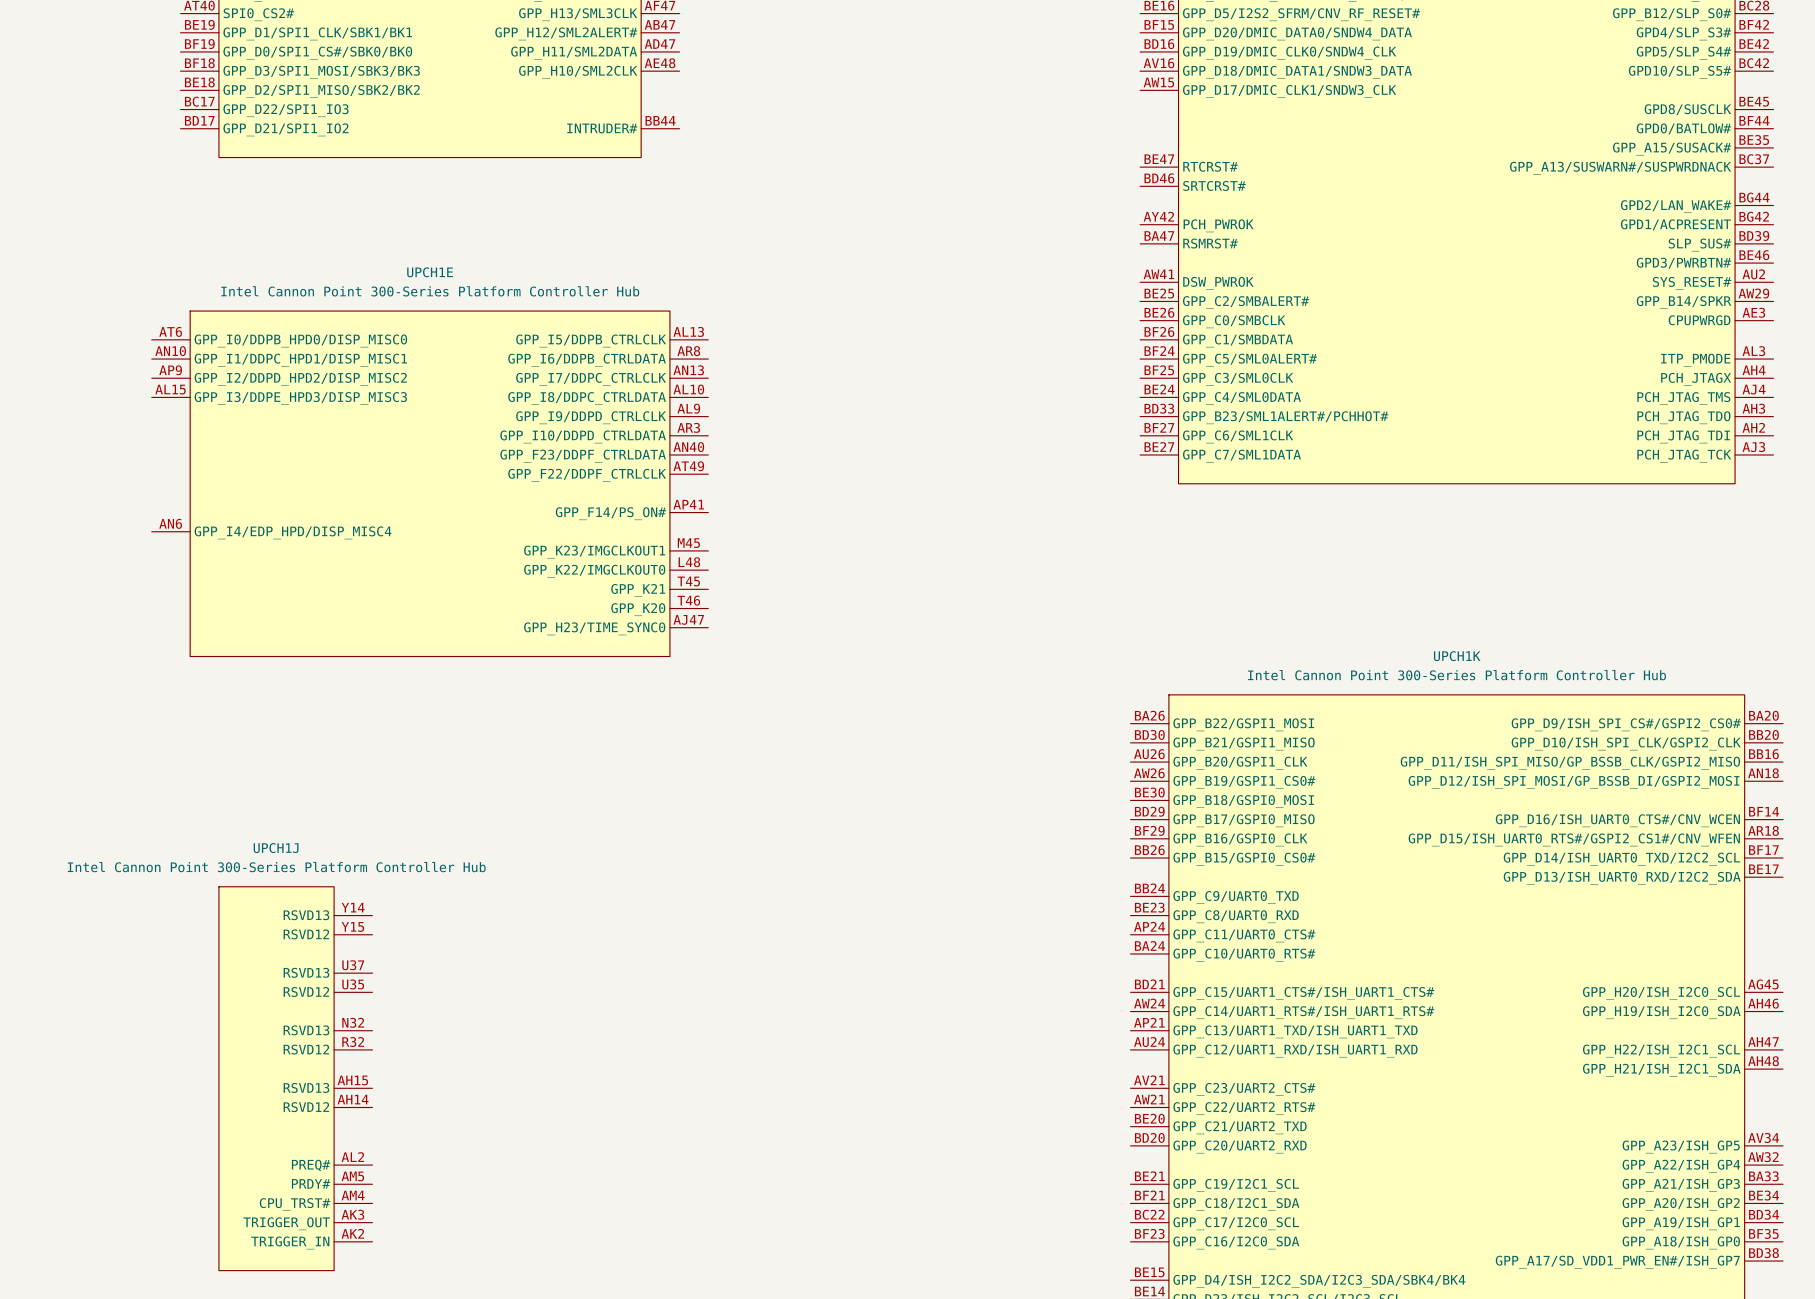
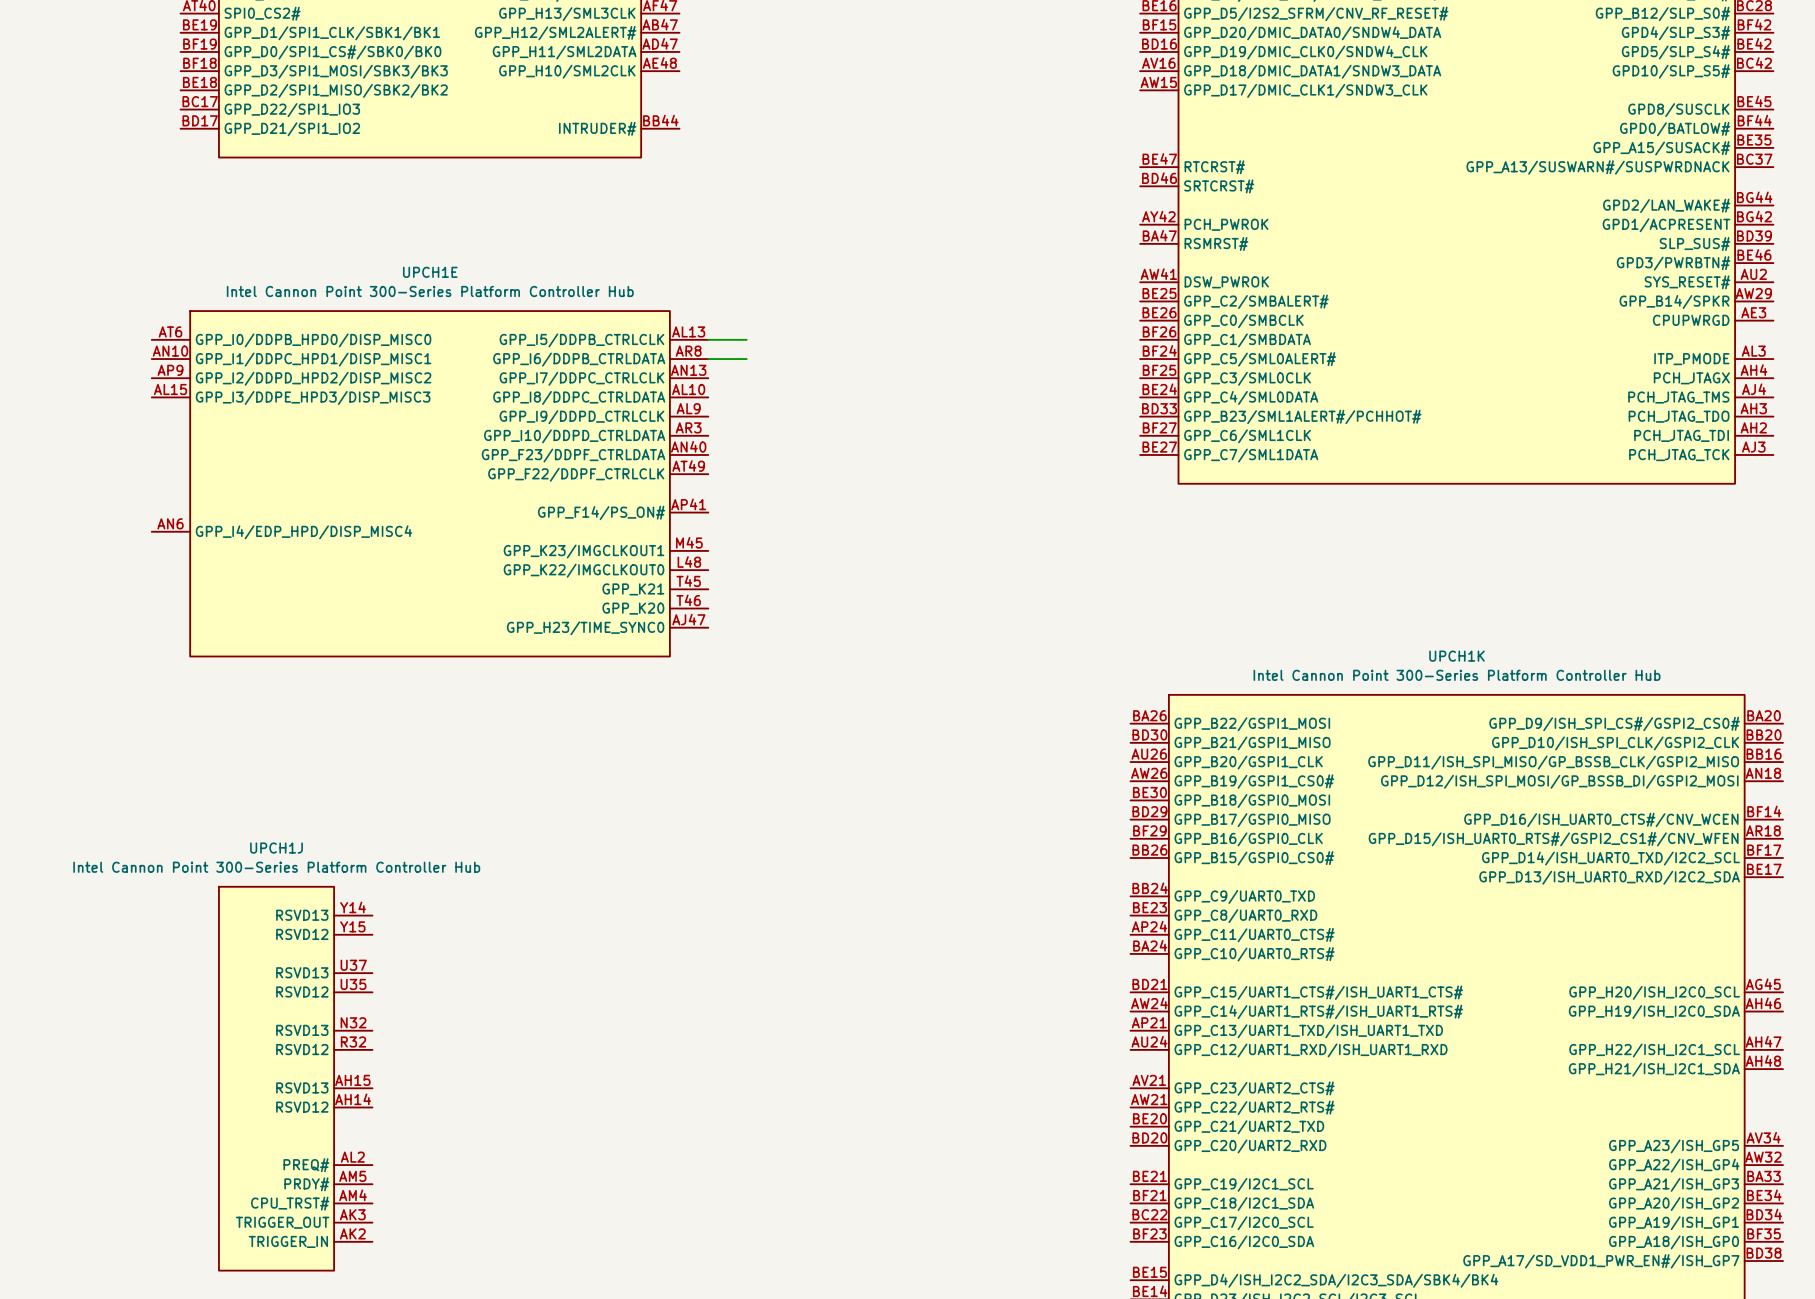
wire: none -> (708, 339) (746, 339)
wire: none -> (708, 359) (746, 359)

